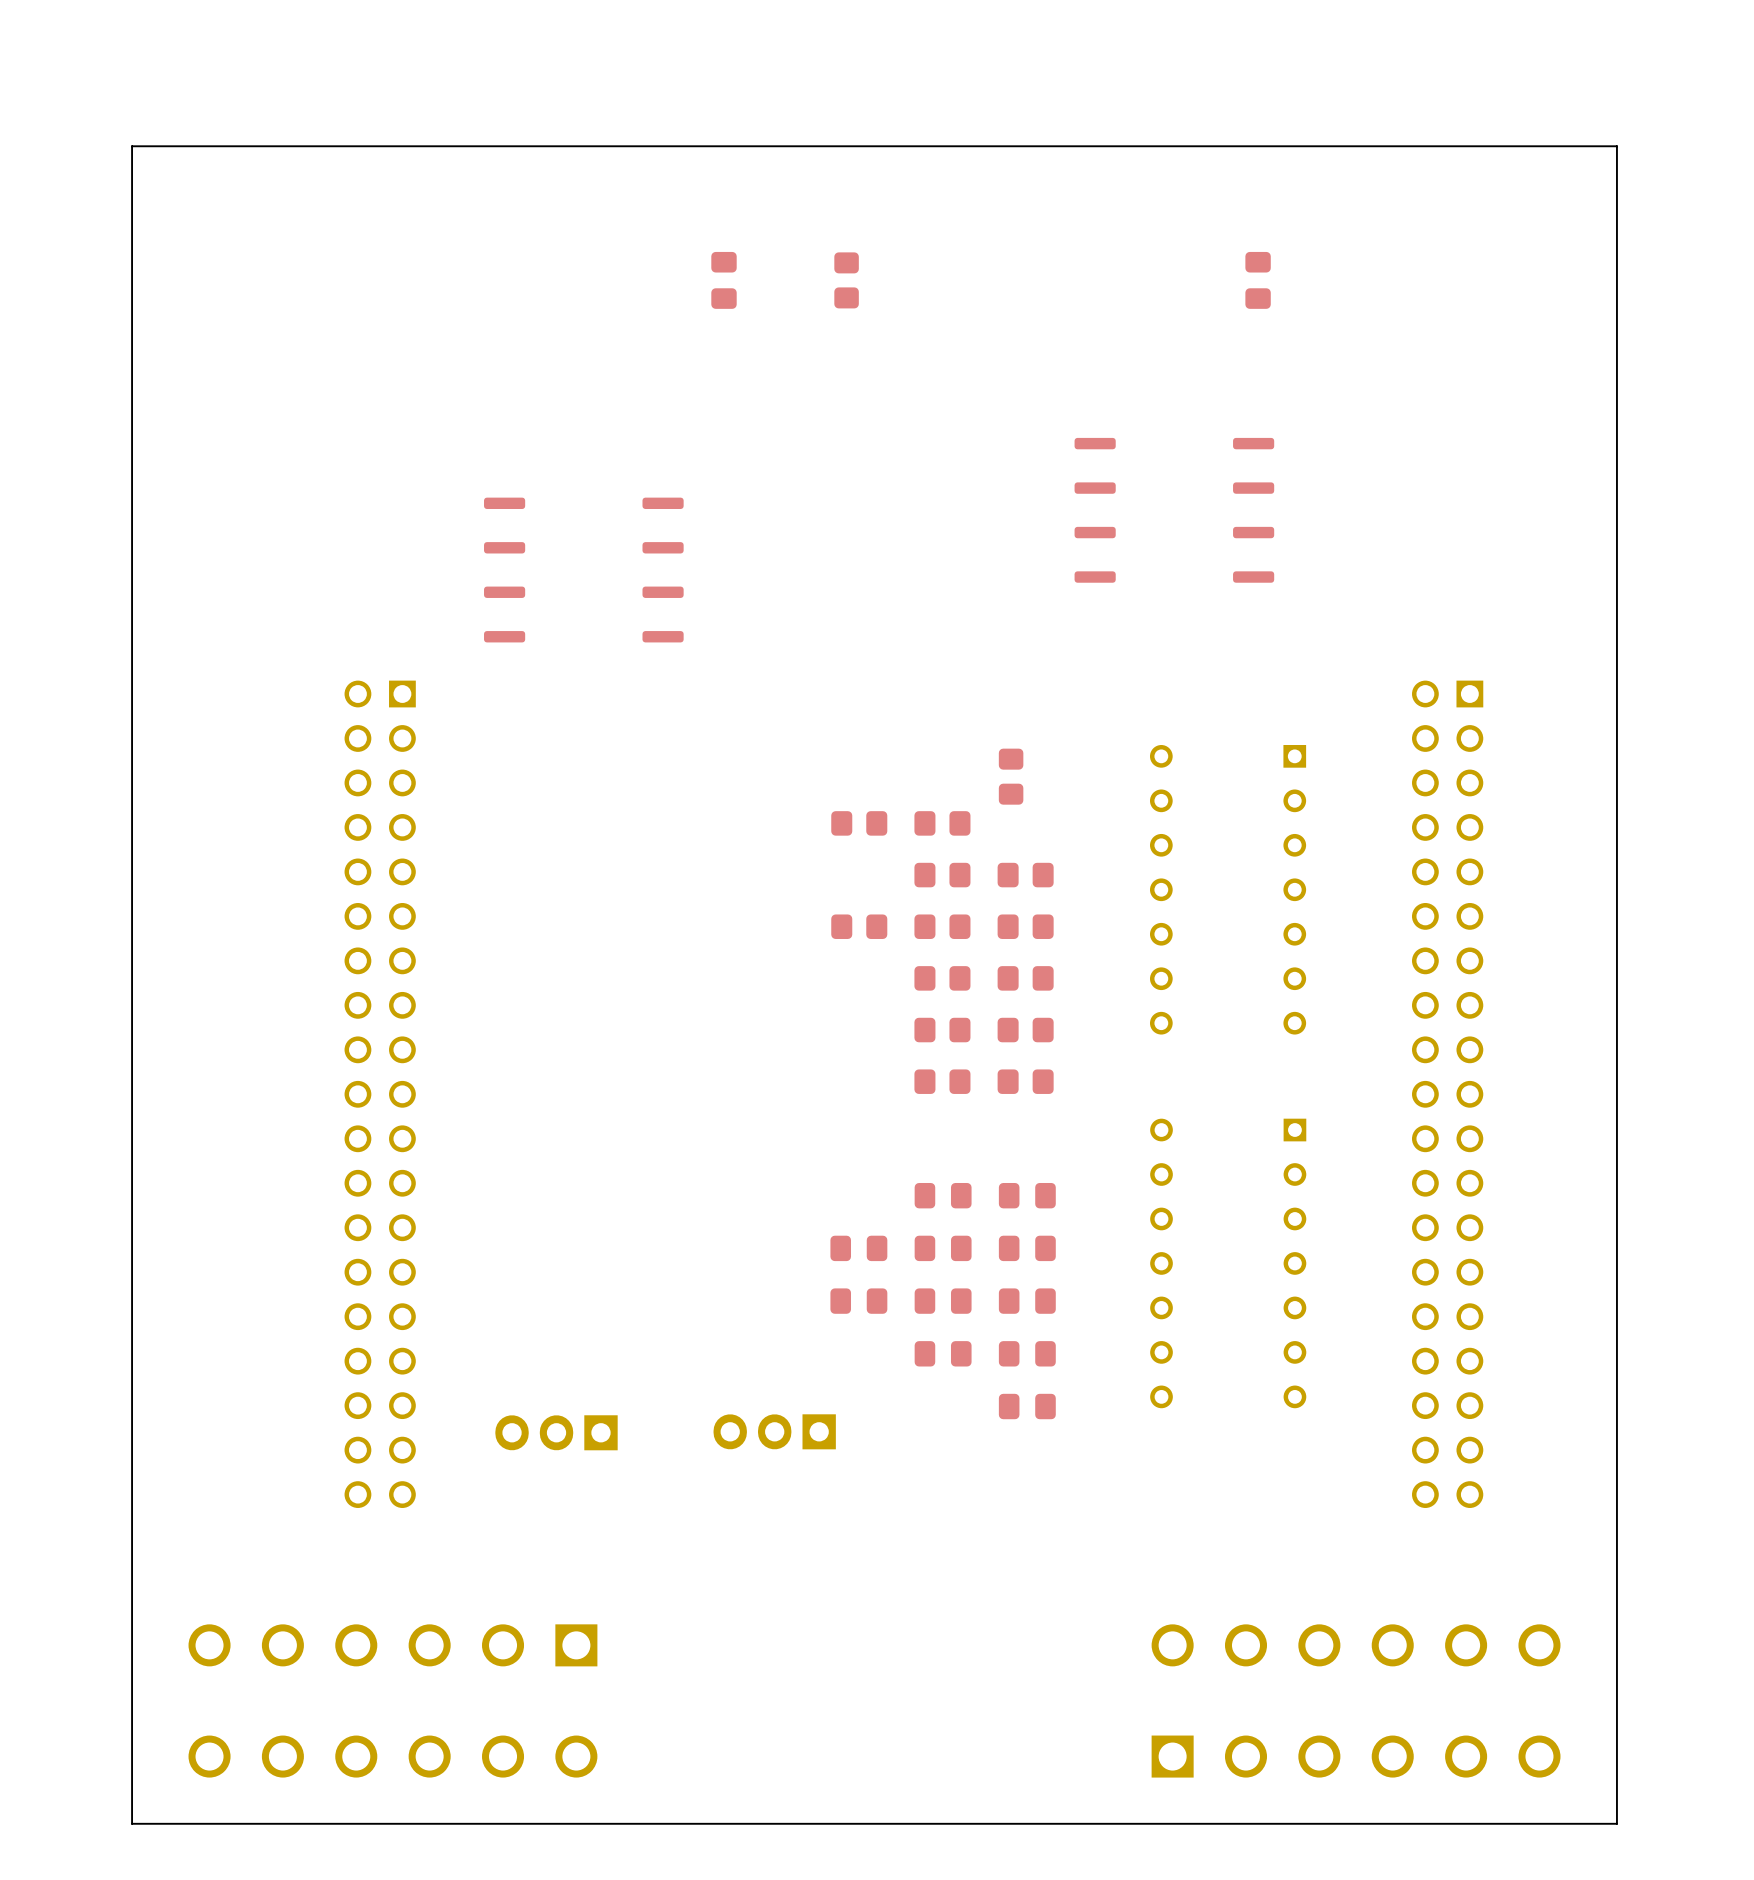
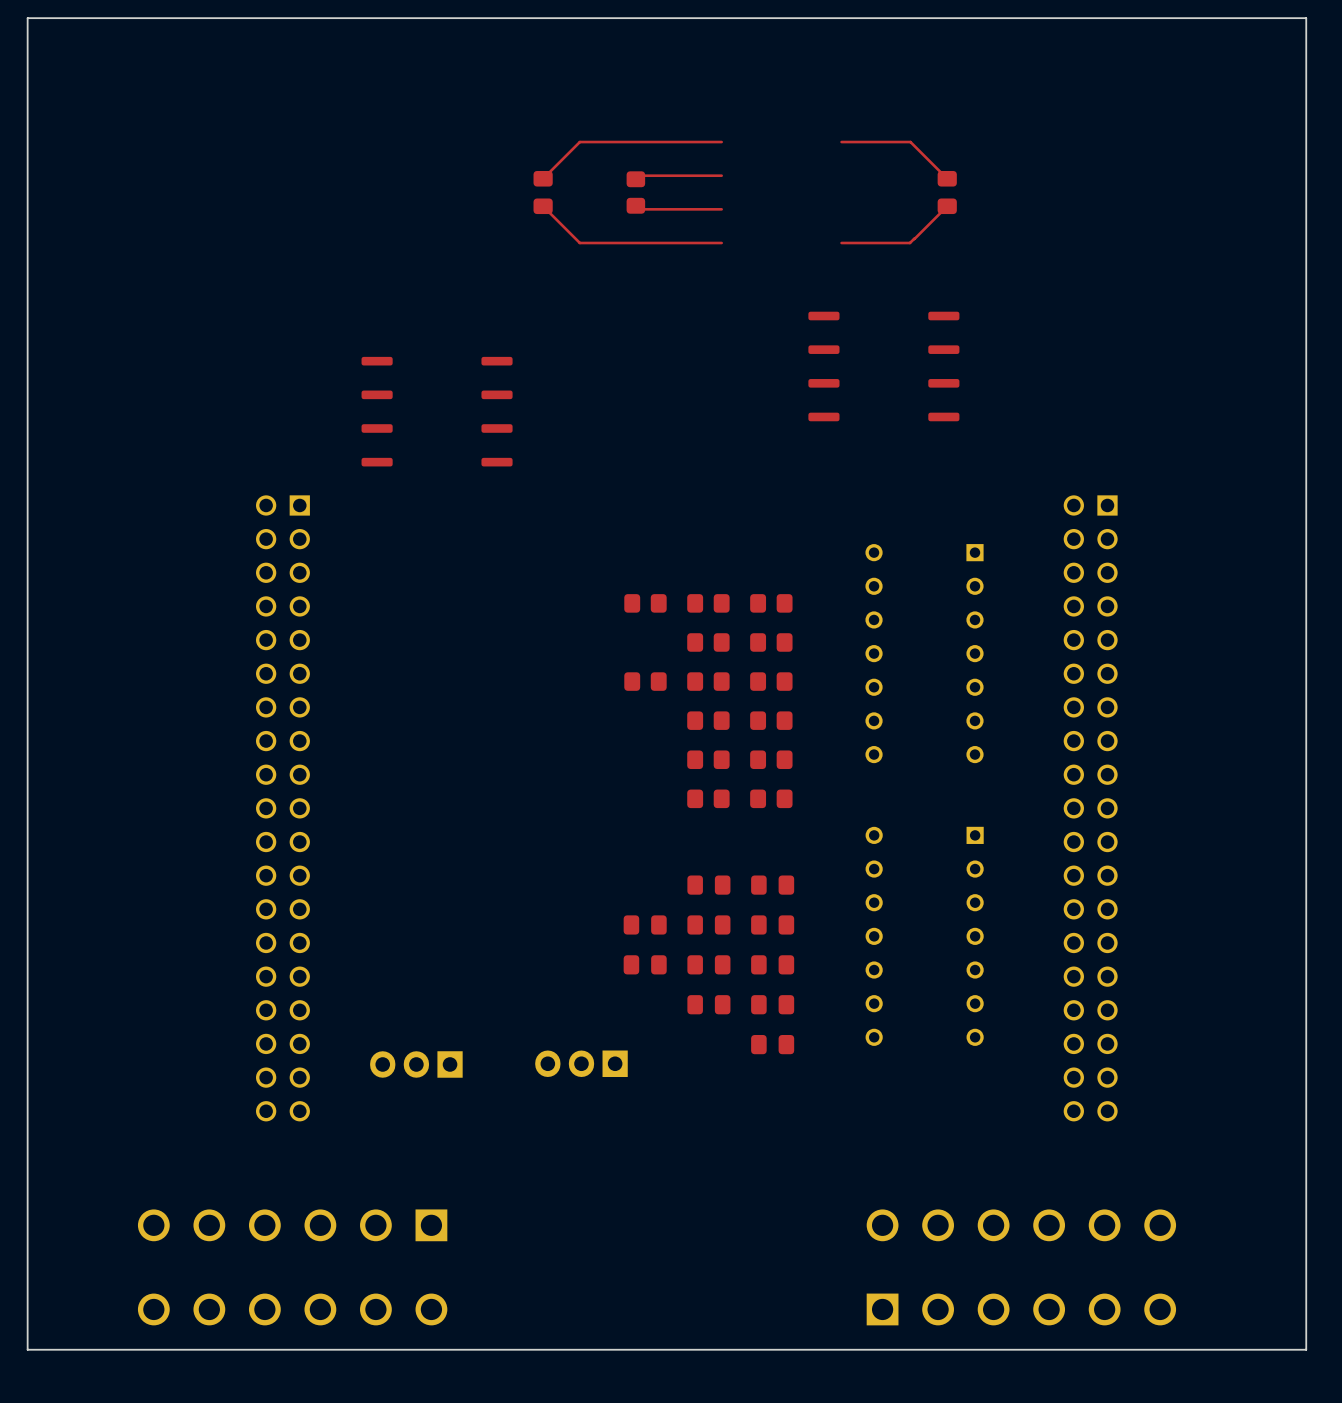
board edge: (1616, 146) (132, 146) (132, 1823) (1616, 1823) (1616, 146) -> (1306, 18) (1306, 1349) (27, 1349) (27, 18) (1306, 18)
top track: none -> (721, 142) (579, 142) (543, 178)
top track: none -> (841, 142) (910, 142) (947, 178)
top track: none -> (721, 175) (639, 175)
top track: none -> (543, 206) (579, 243) (721, 243)
top track: none -> (947, 206) (910, 243) (841, 243)
top track: none -> (721, 209) (639, 209)
part rotation: 0° (1011, 776) -> 90° clockwise (771, 603)
part position: (1011, 776) -> (771, 603)

